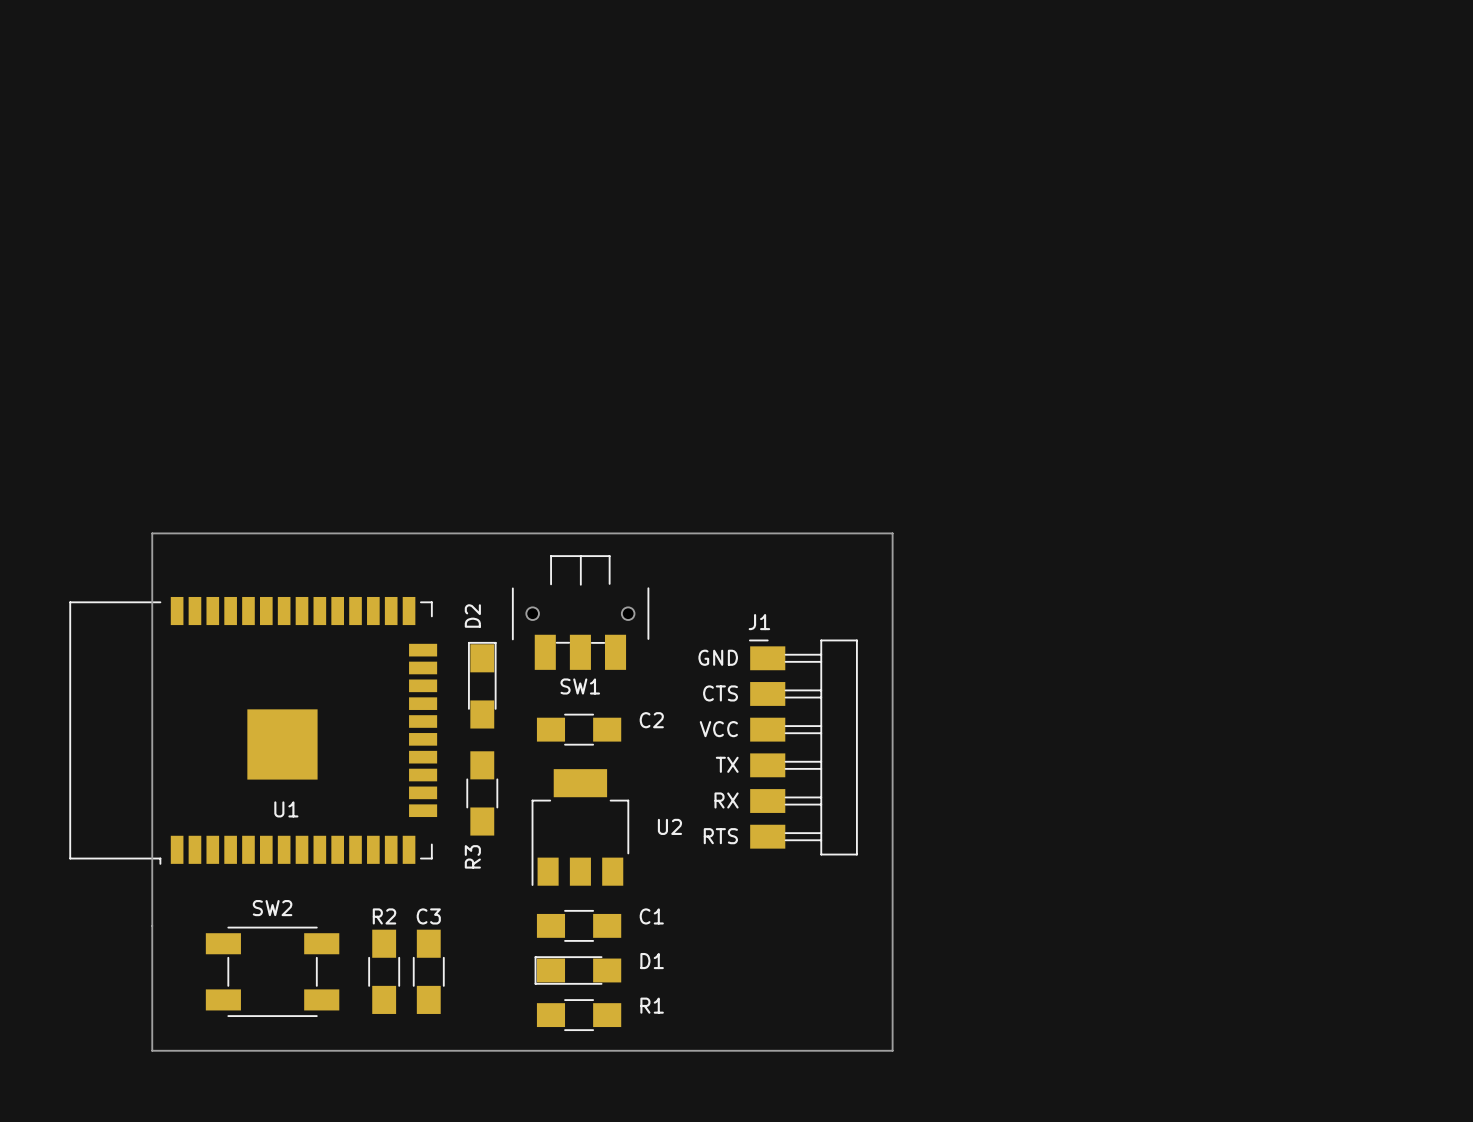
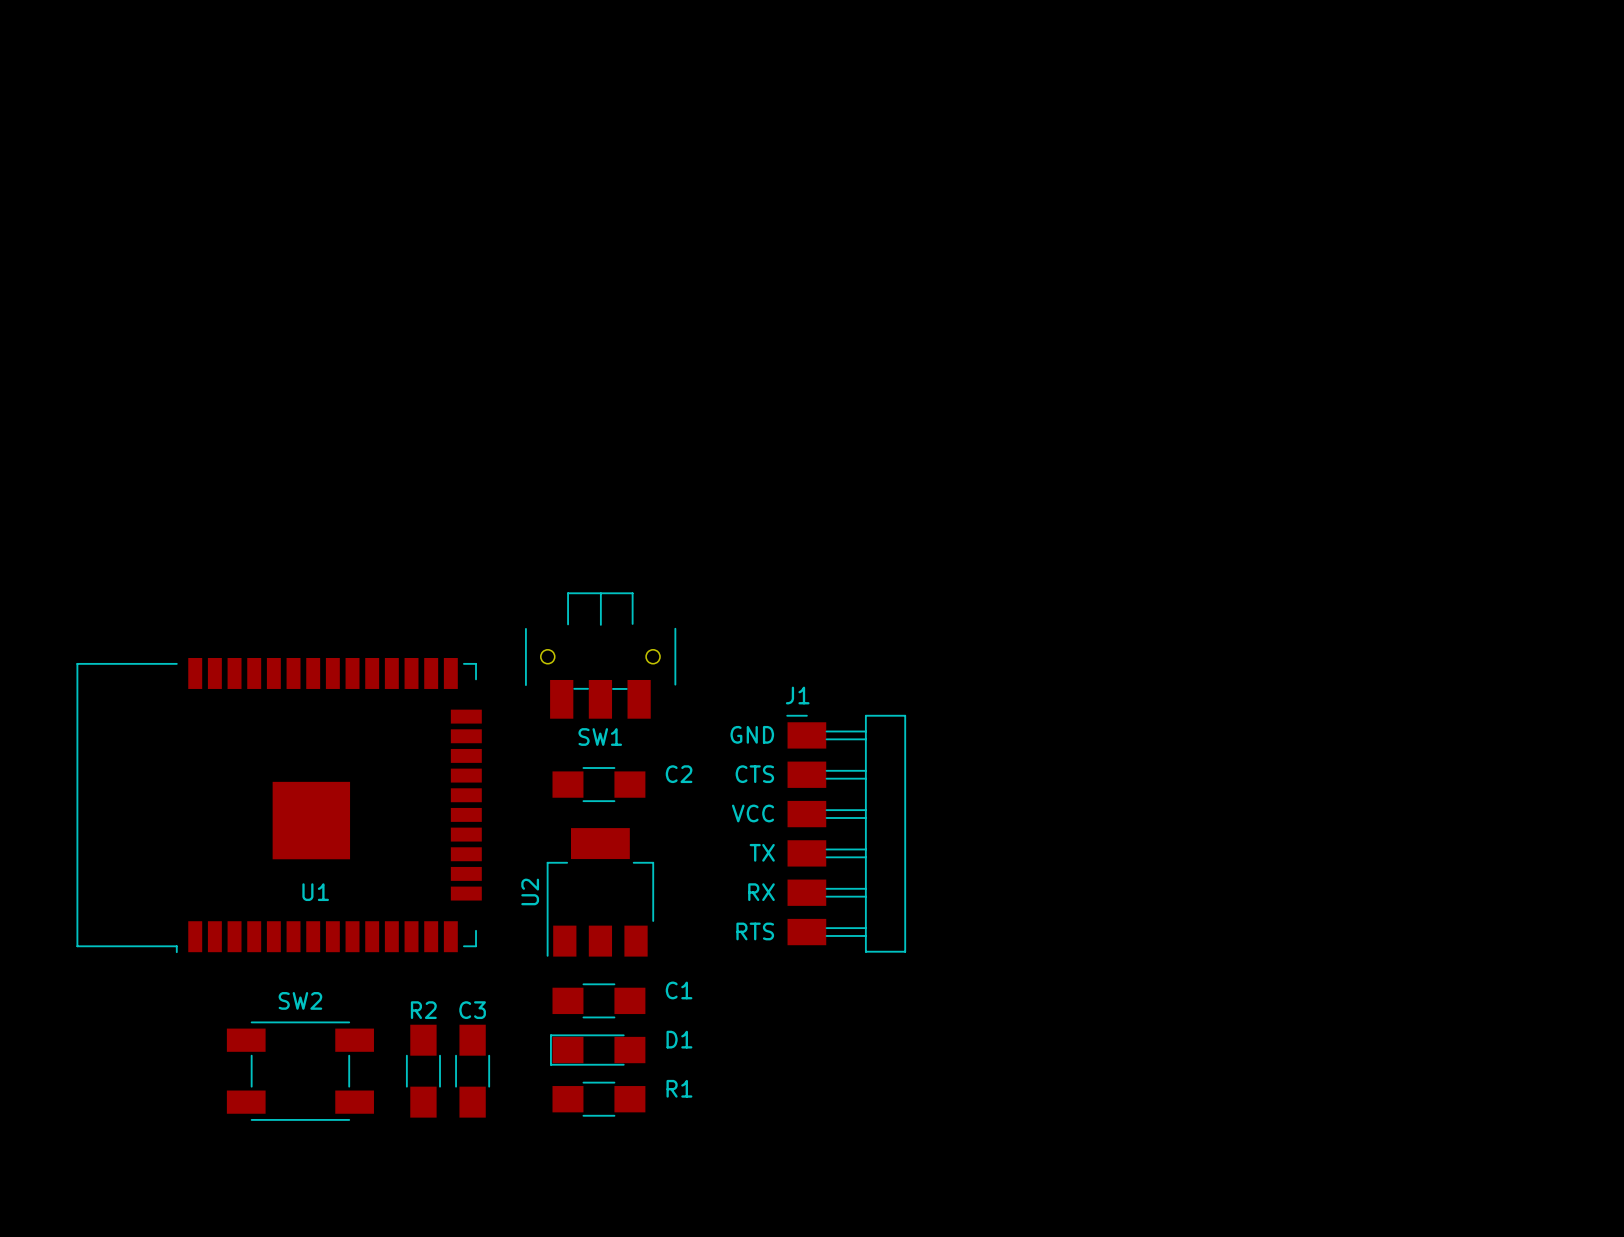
board edge: (152, 533) (152, 1050) (892, 1050) (892, 533) (152, 533) -> none
SW1 position: (580, 612) -> (600, 655)
D2: (482, 685) -> none
C2 position: (579, 729) -> (598, 784)
J1 position: (803, 747) -> (846, 833)
R3: (482, 793) -> none
U2 name rotation: 0° (669, 826) -> 90° counterclockwise (530, 891)
U2 name position: U2 (669, 826) -> U2 (530, 891)
U2 position: (580, 827) -> (600, 892)
C1 position: (579, 925) -> (598, 1000)
D1 position: (577, 970) -> (597, 1050)
R1 position: (579, 1015) -> (598, 1099)

